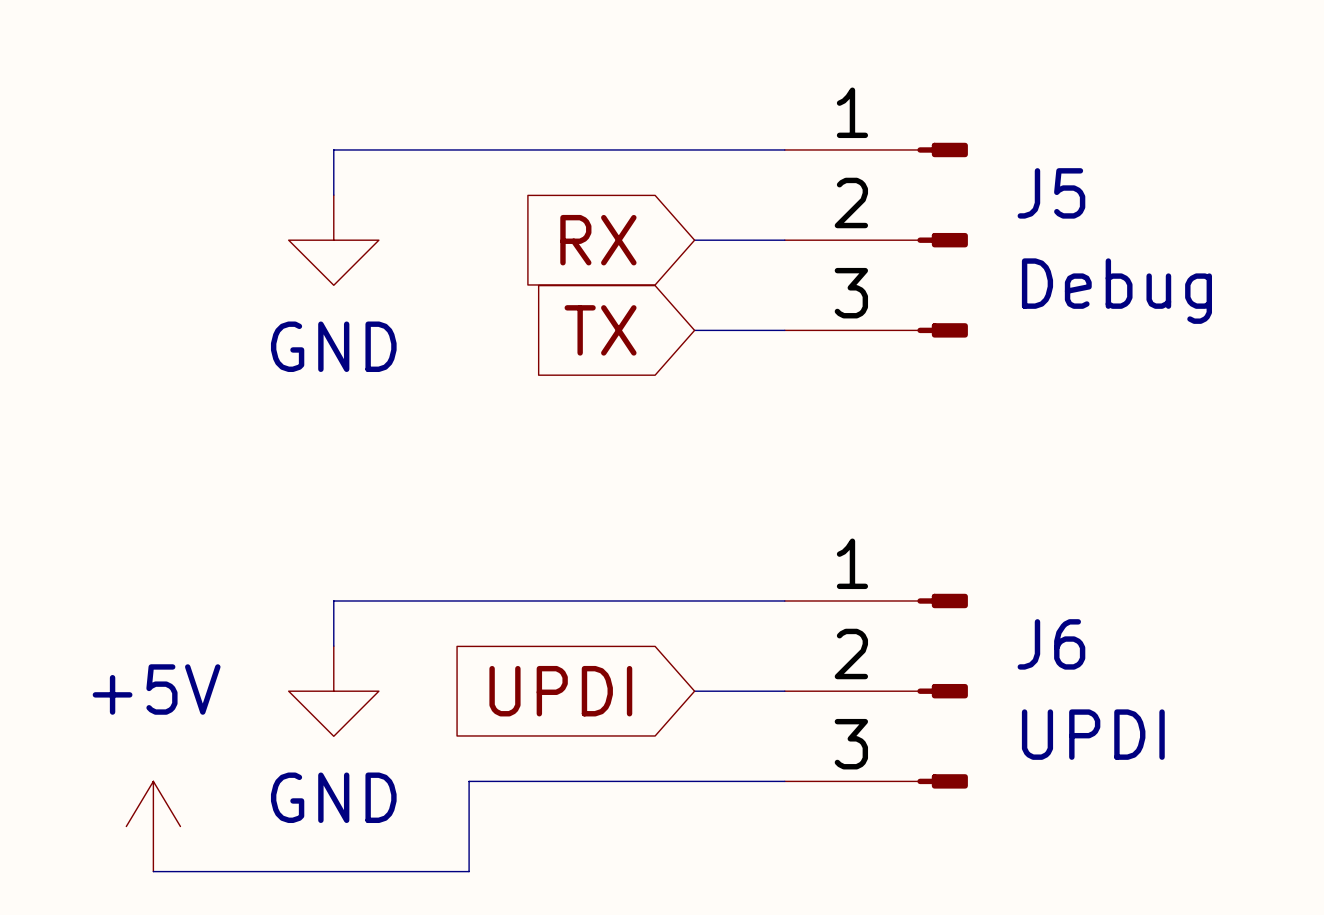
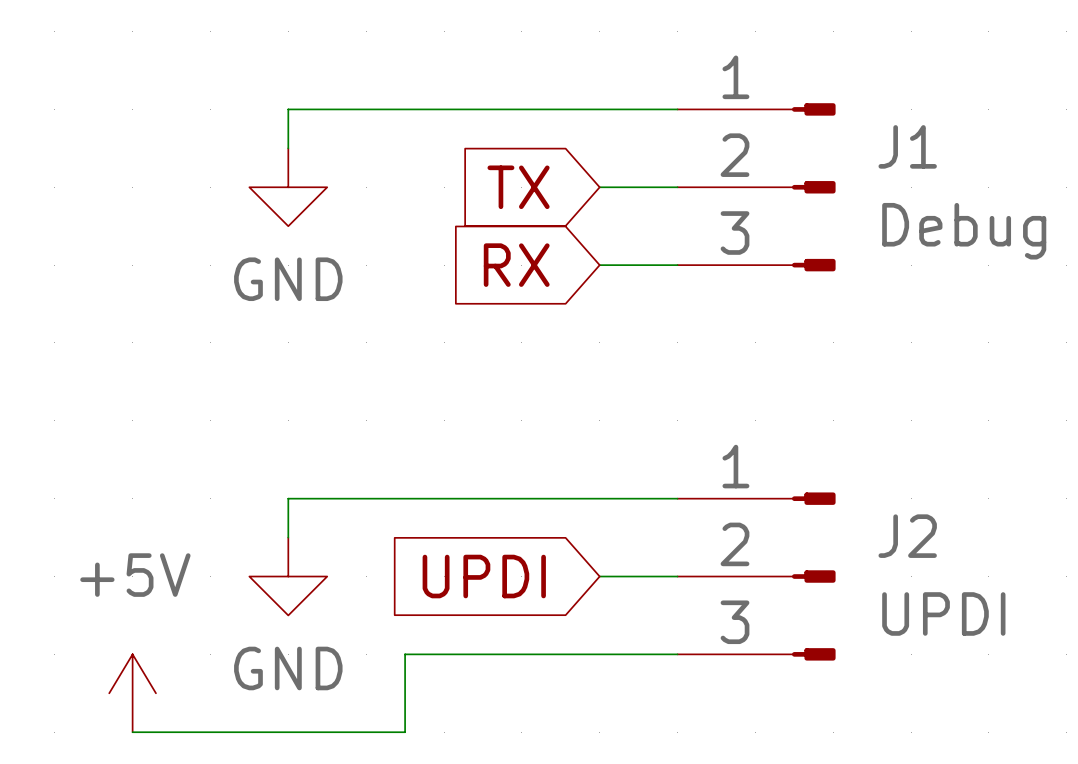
J5 name: J5 (1051, 193) -> J1 (907, 146)
global label: RX (598, 240) -> TX (518, 187)
global label: TX (600, 330) -> RX (516, 265)
J6 name: J6 (1051, 644) -> J2 (907, 536)

